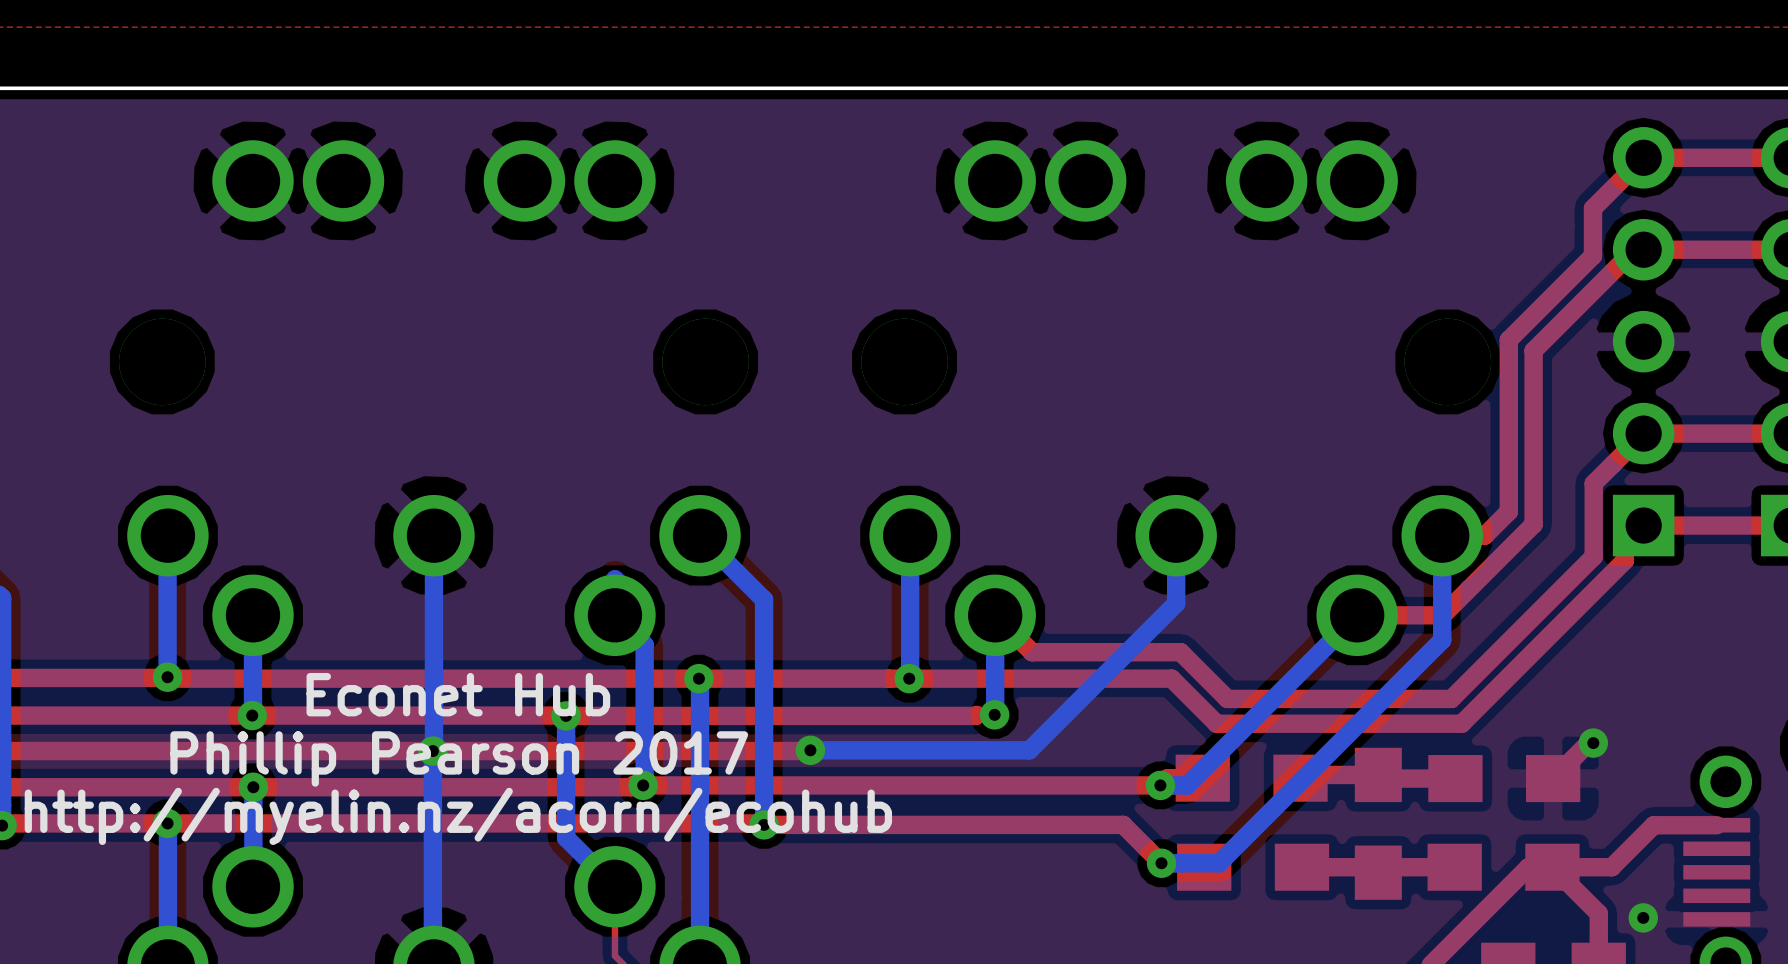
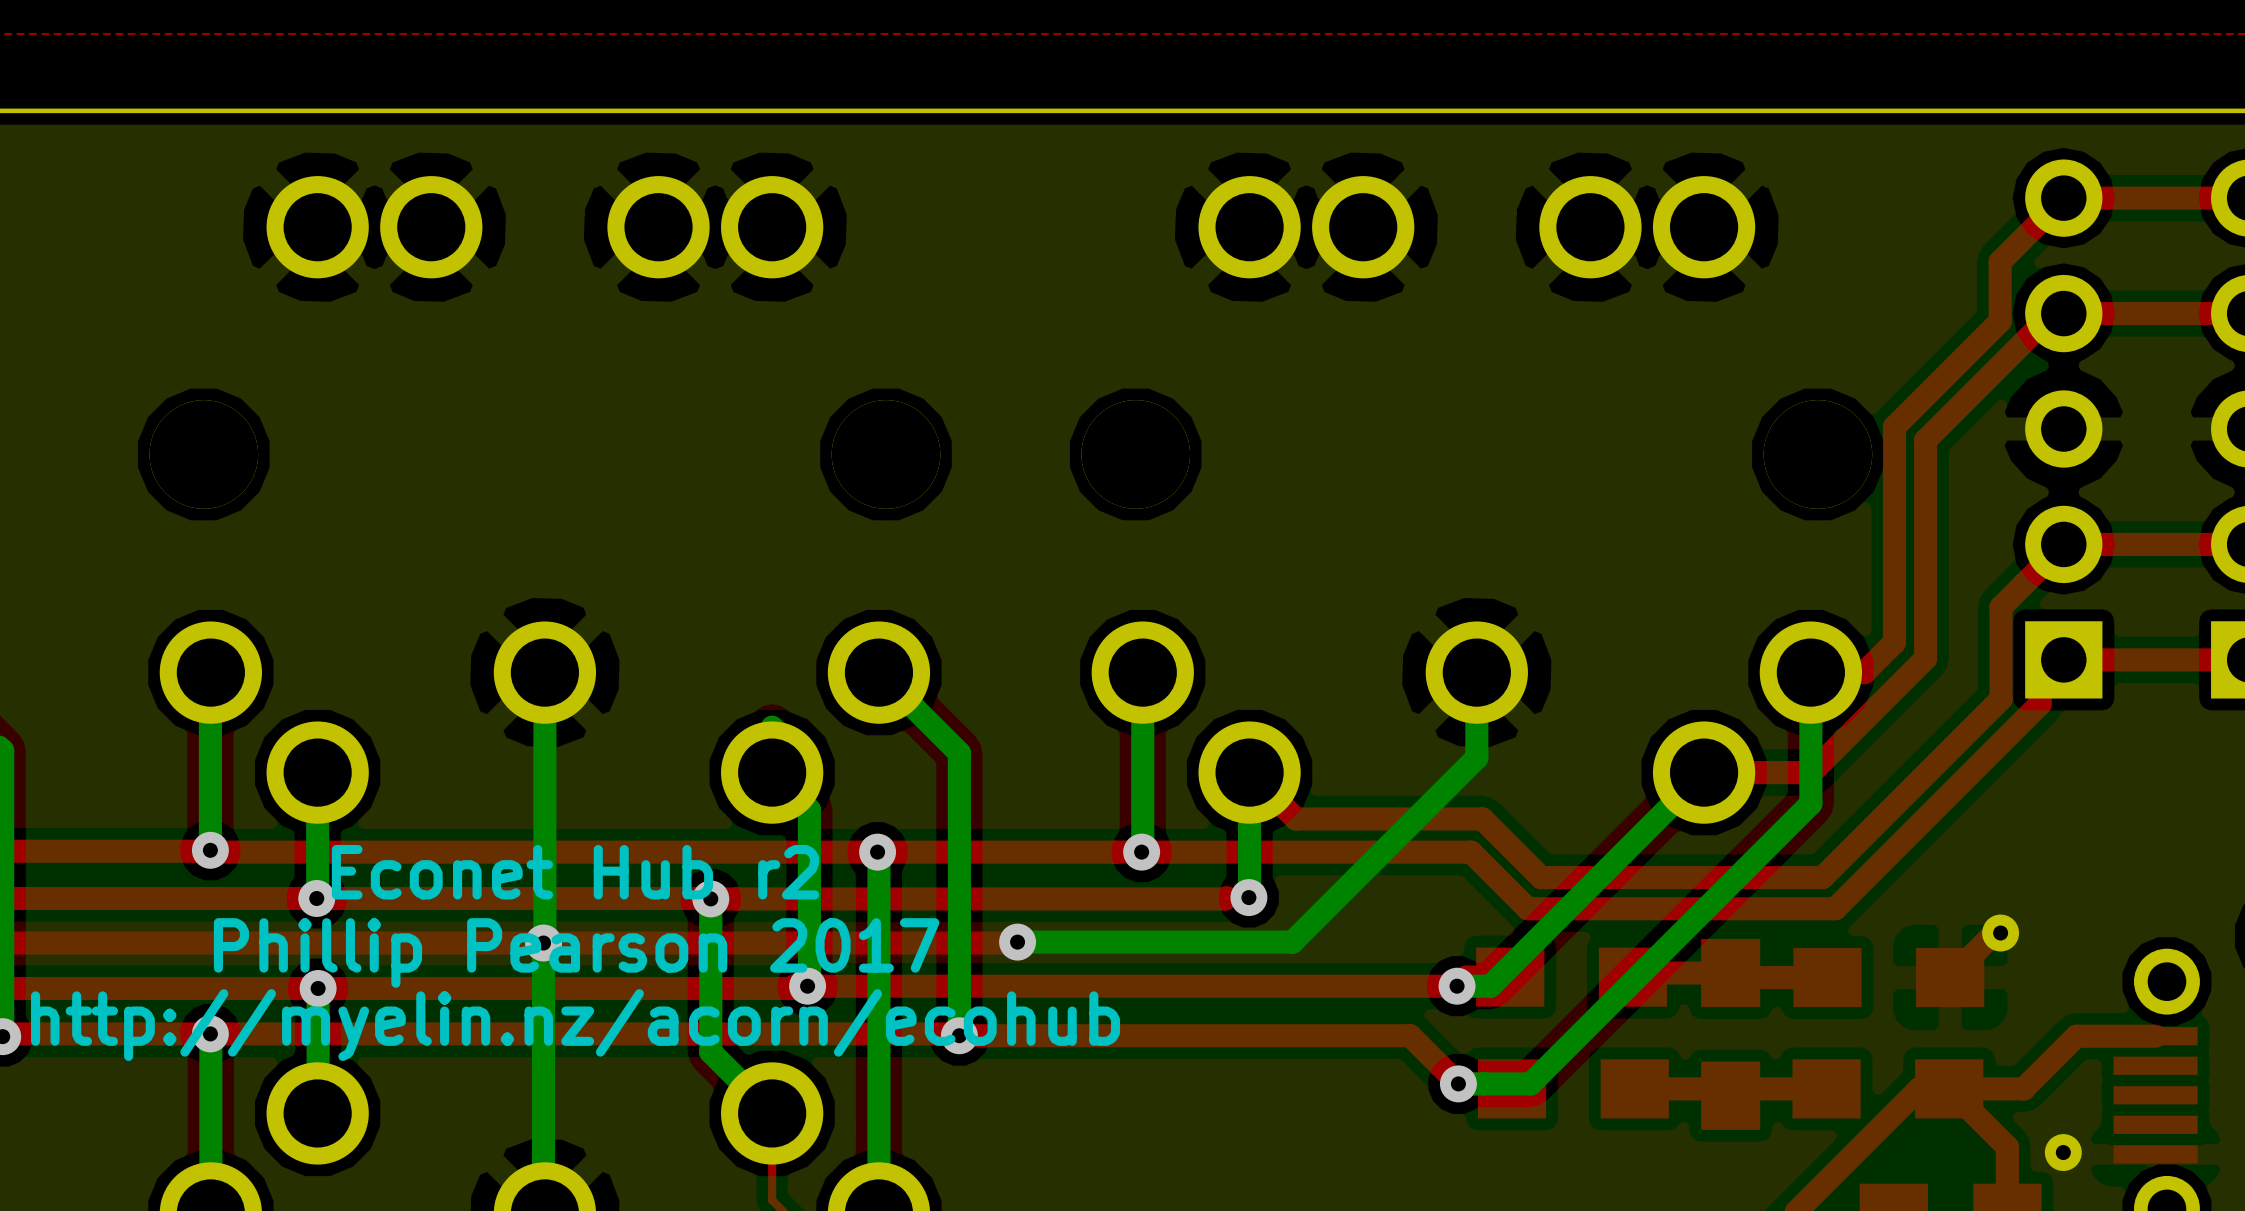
text: Econet Hub (458, 694) -> Econet Hub r2 (575, 872)

